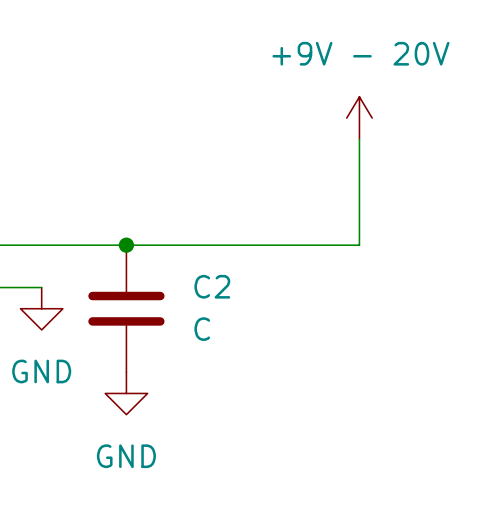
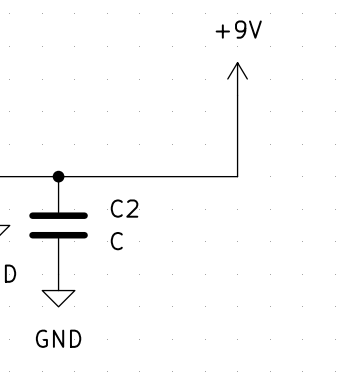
power symbol: +9V - 20V (359, 118) -> +9V (237, 79)

